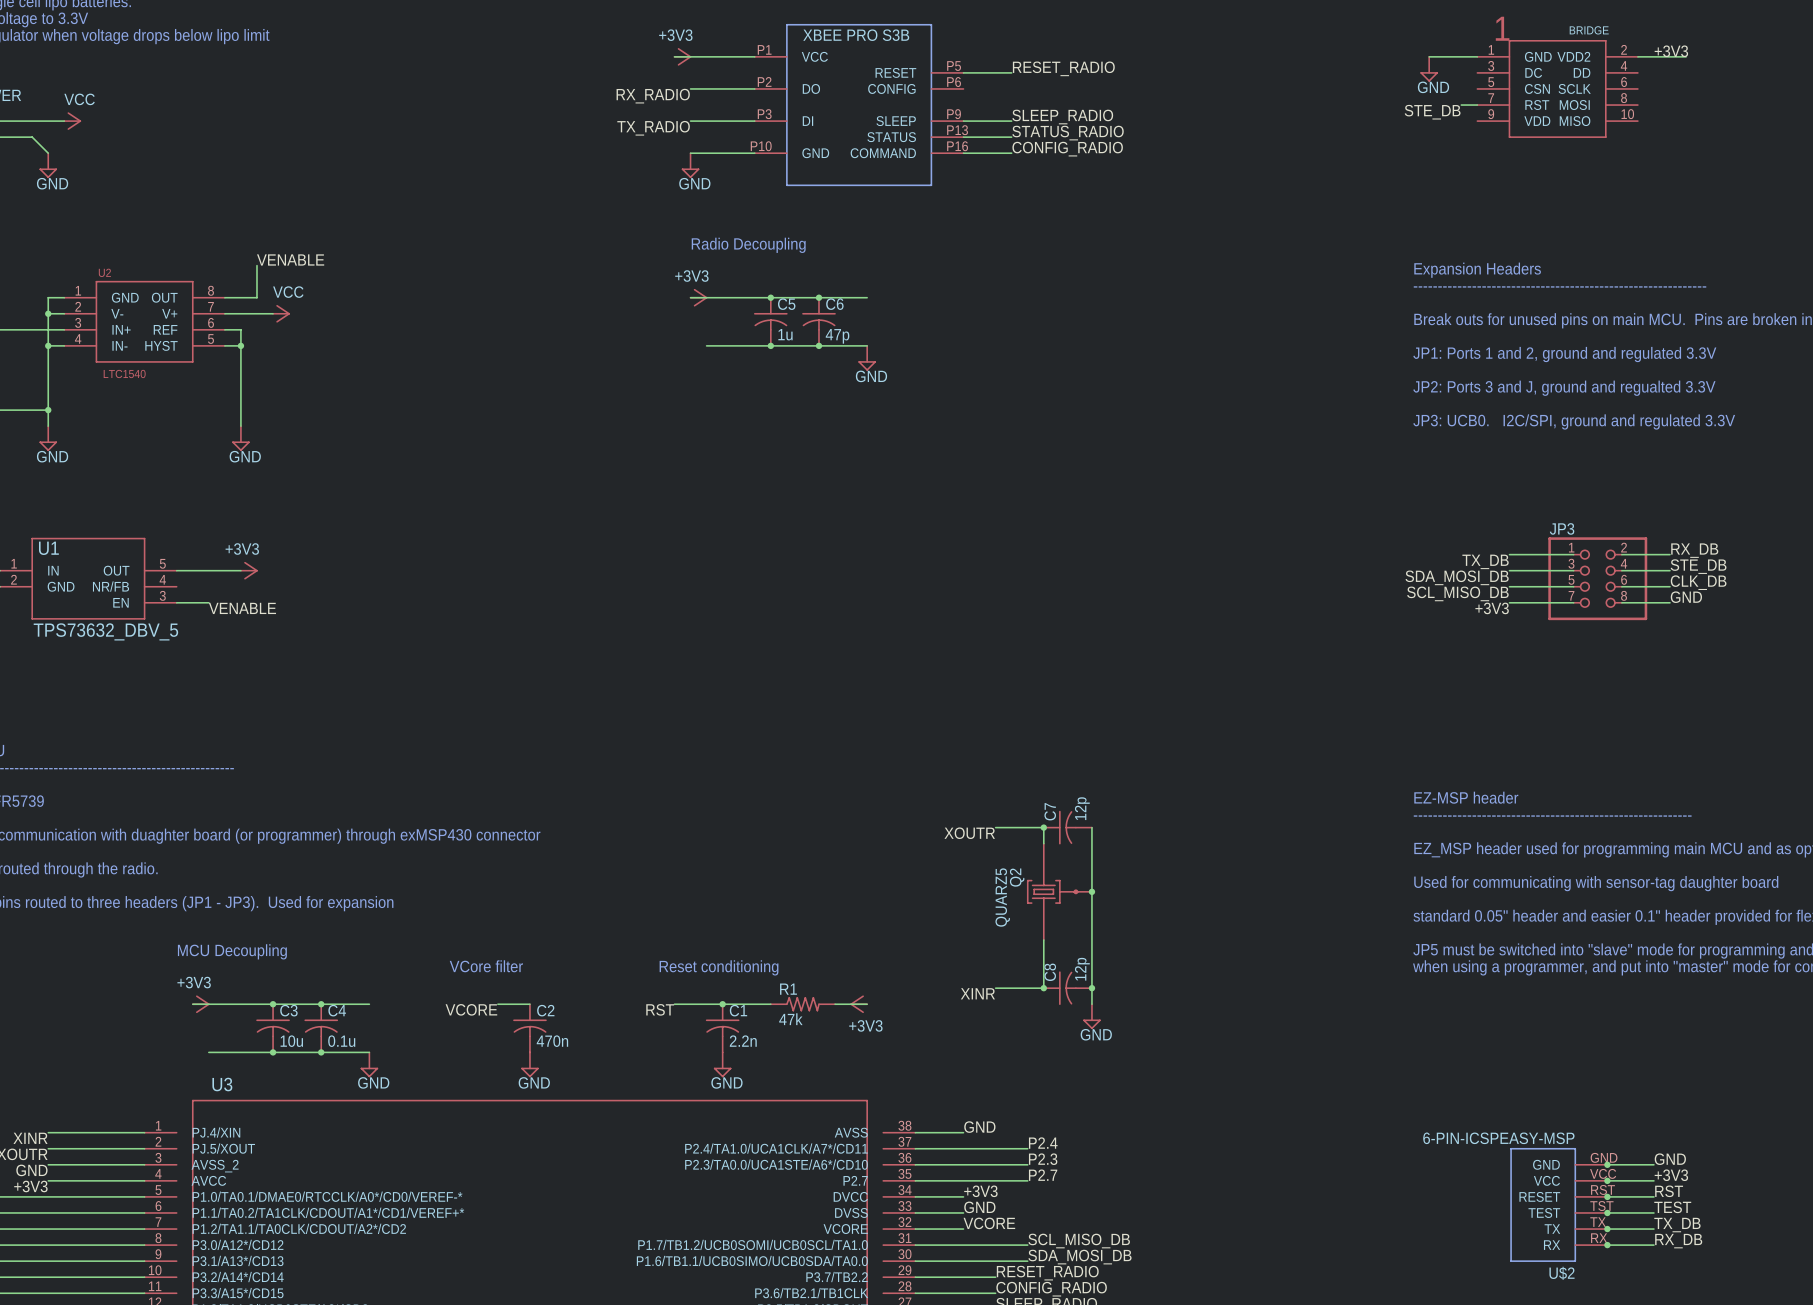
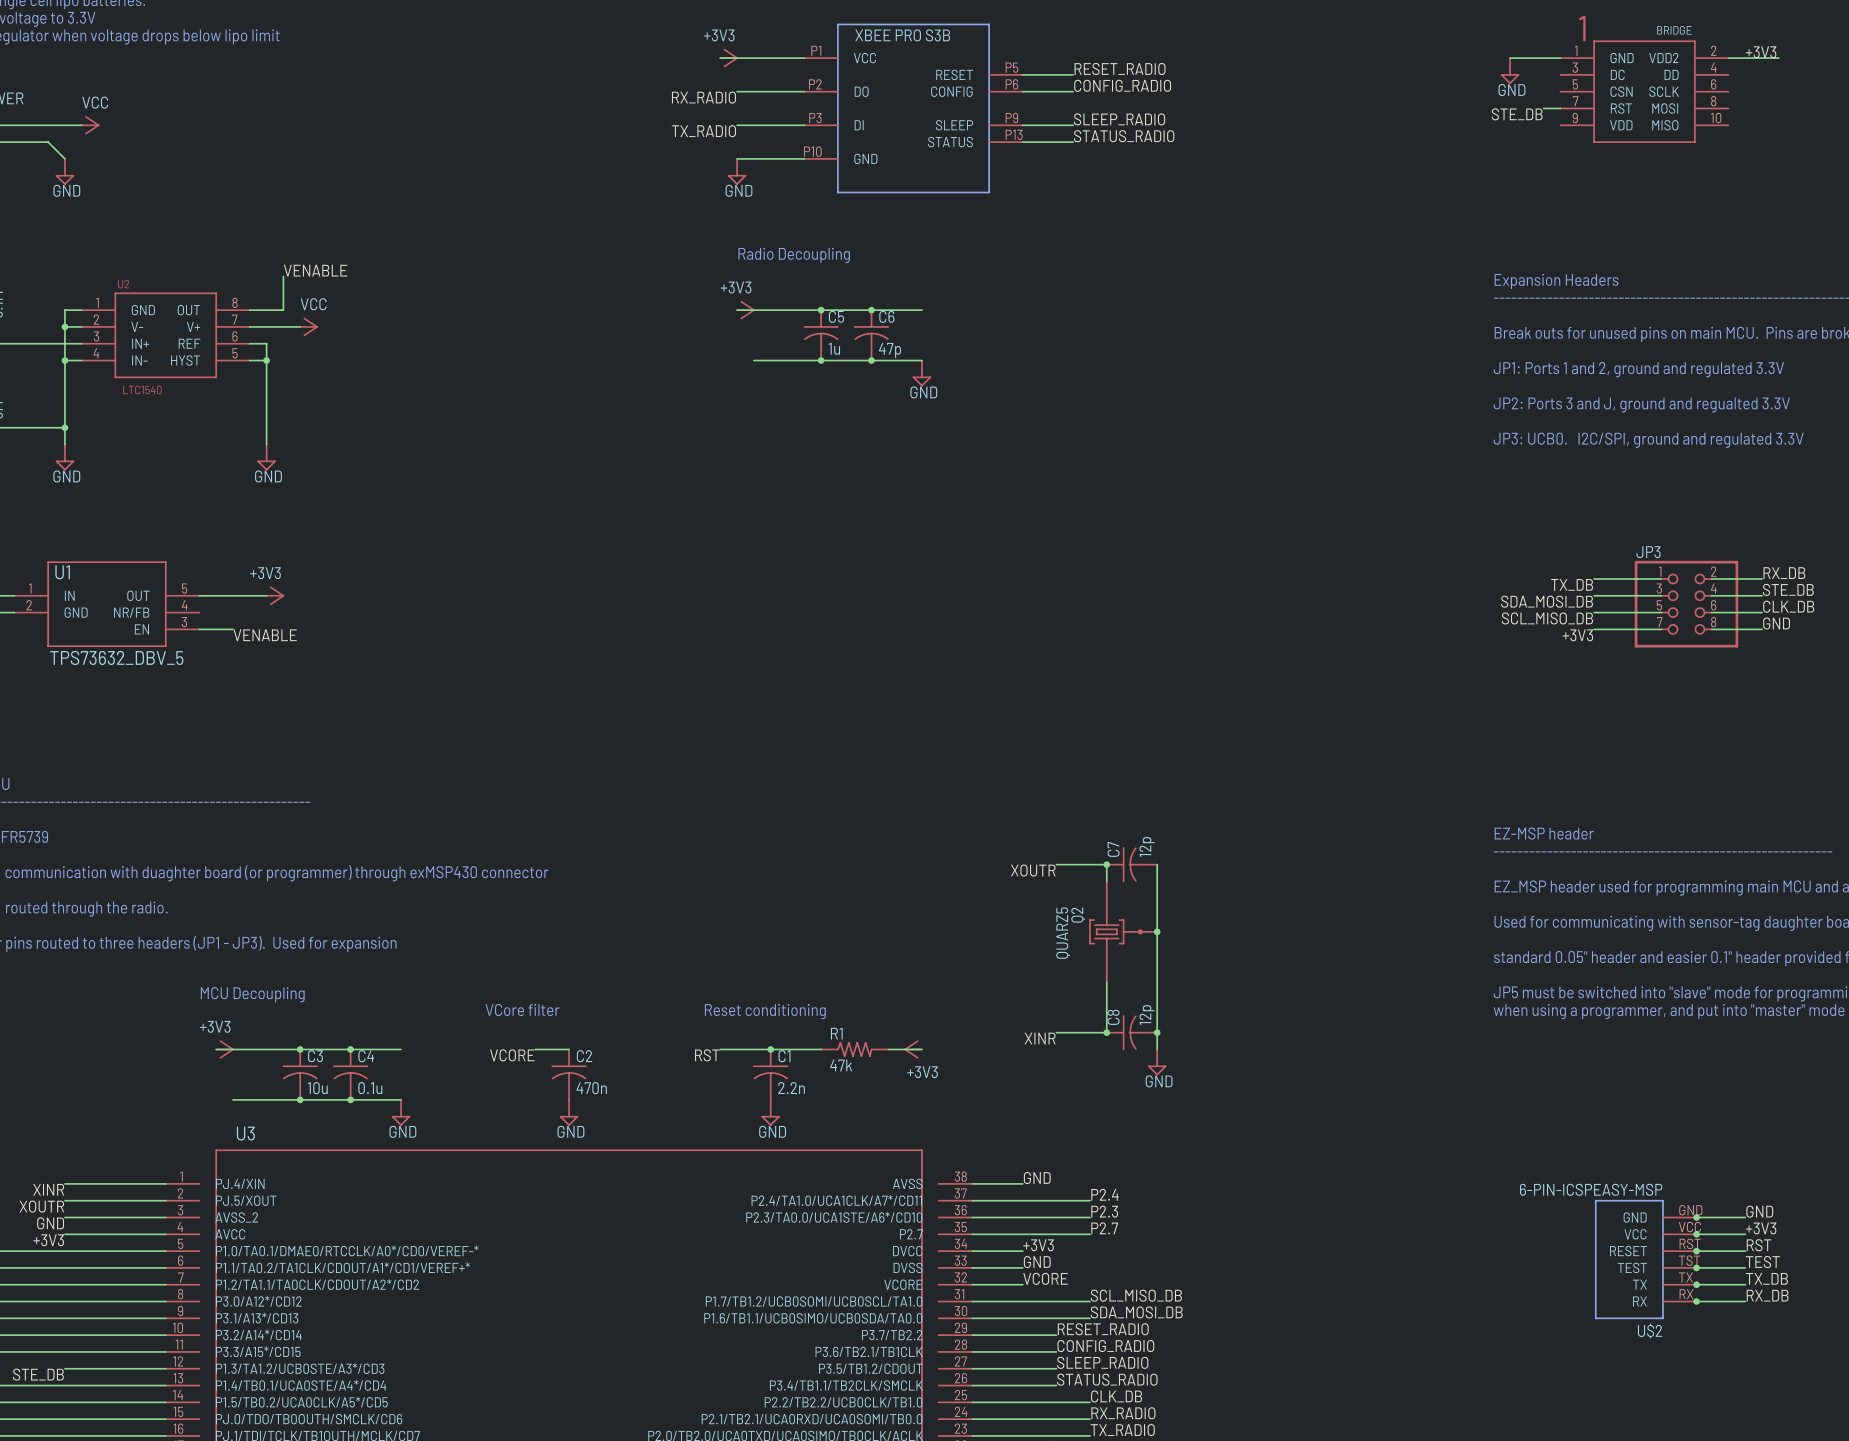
part symbol: [754, 23, 964, 187] -> [804, 23, 1023, 194]
label position: CONFIG_RADIO (1067, 149) -> CONFIG_RADIO (1122, 85)
wire: (963, 153) (1011, 153) -> (1022, 91) (1073, 91)

